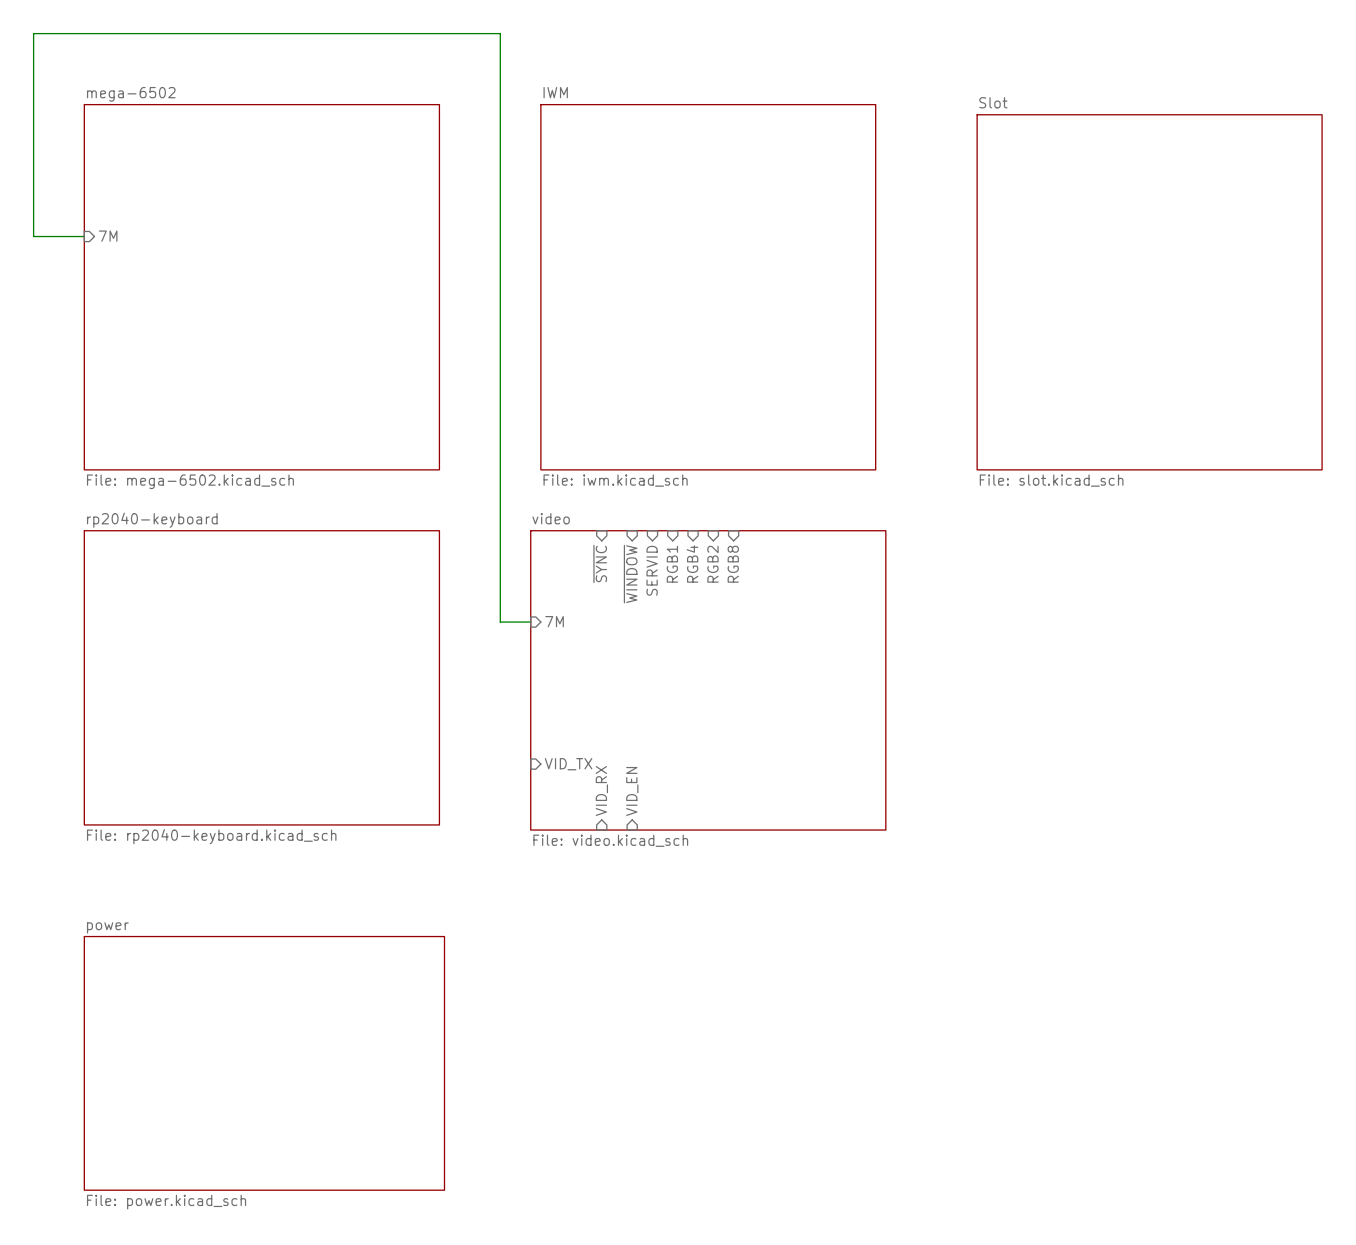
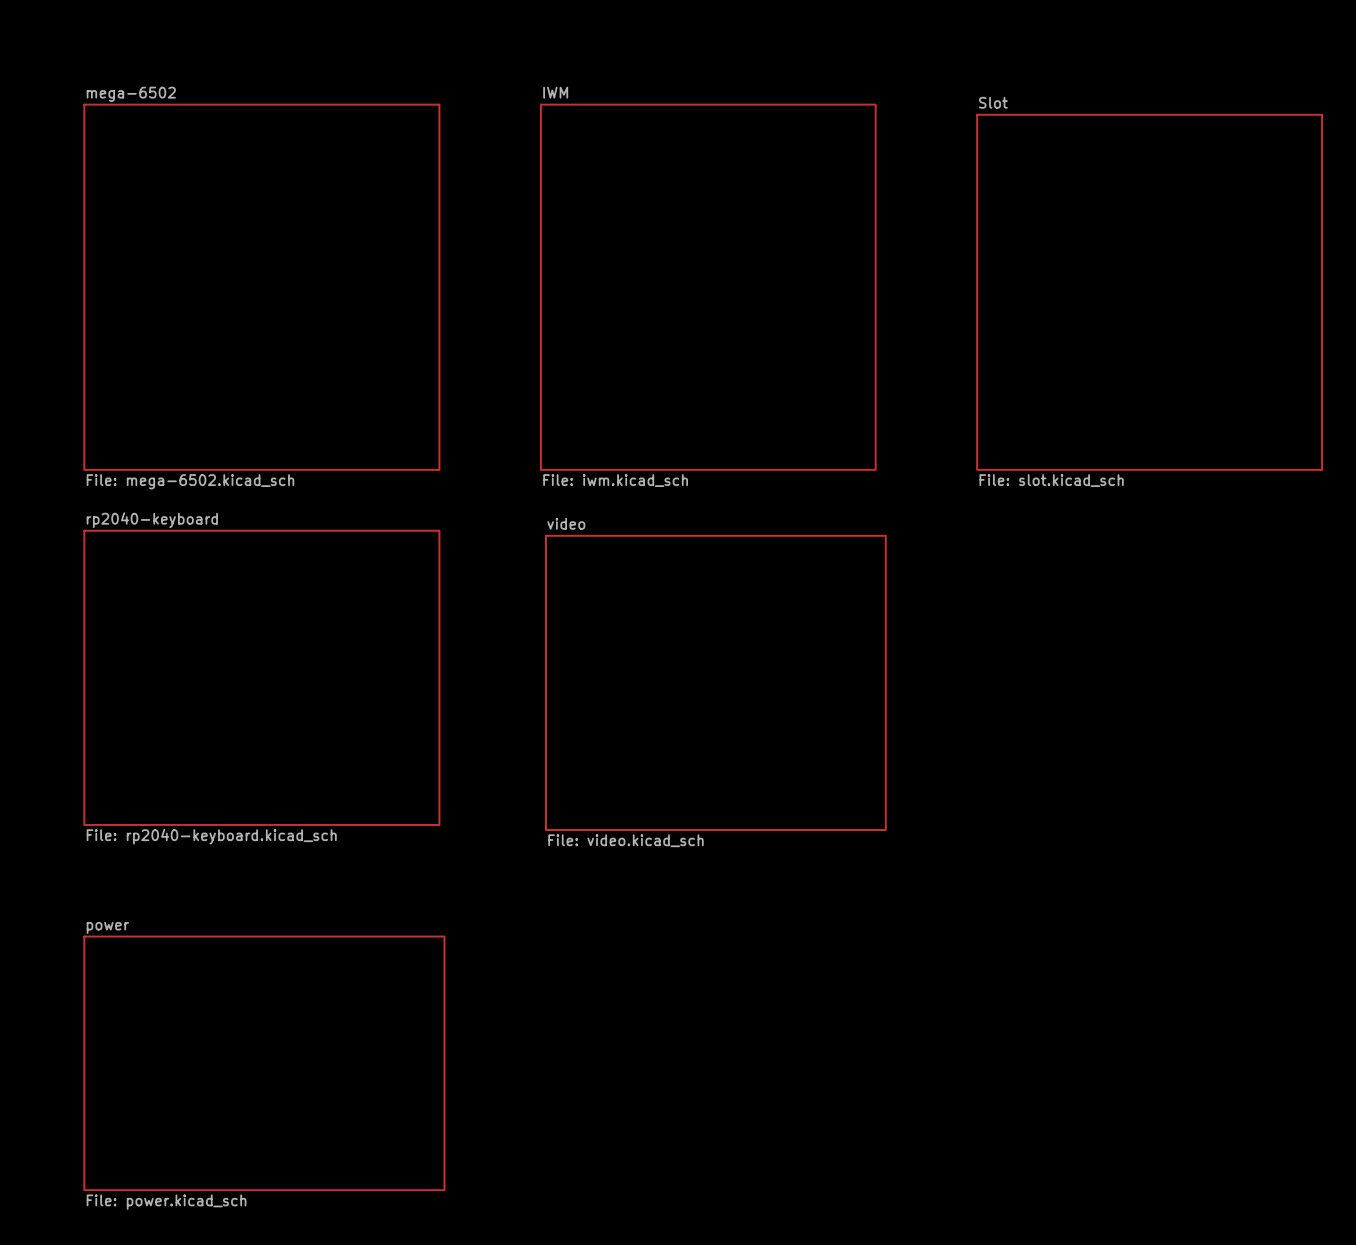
wire: (84, 236) (33, 236) (33, 33) (500, 33) (500, 622) (530, 622) -> none
sheet pin: 7M (108, 236) -> none
sheet pin: ~{SYNC} (600, 563) -> none
sheet pin: RGB4 (692, 563) -> none
sheet pin: RGB1 (672, 564) -> none
sheet pin: RGB2 (712, 564) -> none
sheet pin: RGB8 (733, 564) -> none
sheet pin: SERVID (652, 570) -> none
sheet pin: ~{WINDOW} (630, 574) -> none
sheet pin: 7M (554, 621) -> none
sheet video: File: video.kicad_sch (708, 680) -> none
sheet video: none -> File: video.kicad_sch (715, 682)
sheet pin: VID_TX (568, 764) -> none
sheet pin: VID_RX (601, 790) -> none
sheet pin: VID_EN (632, 791) -> none

